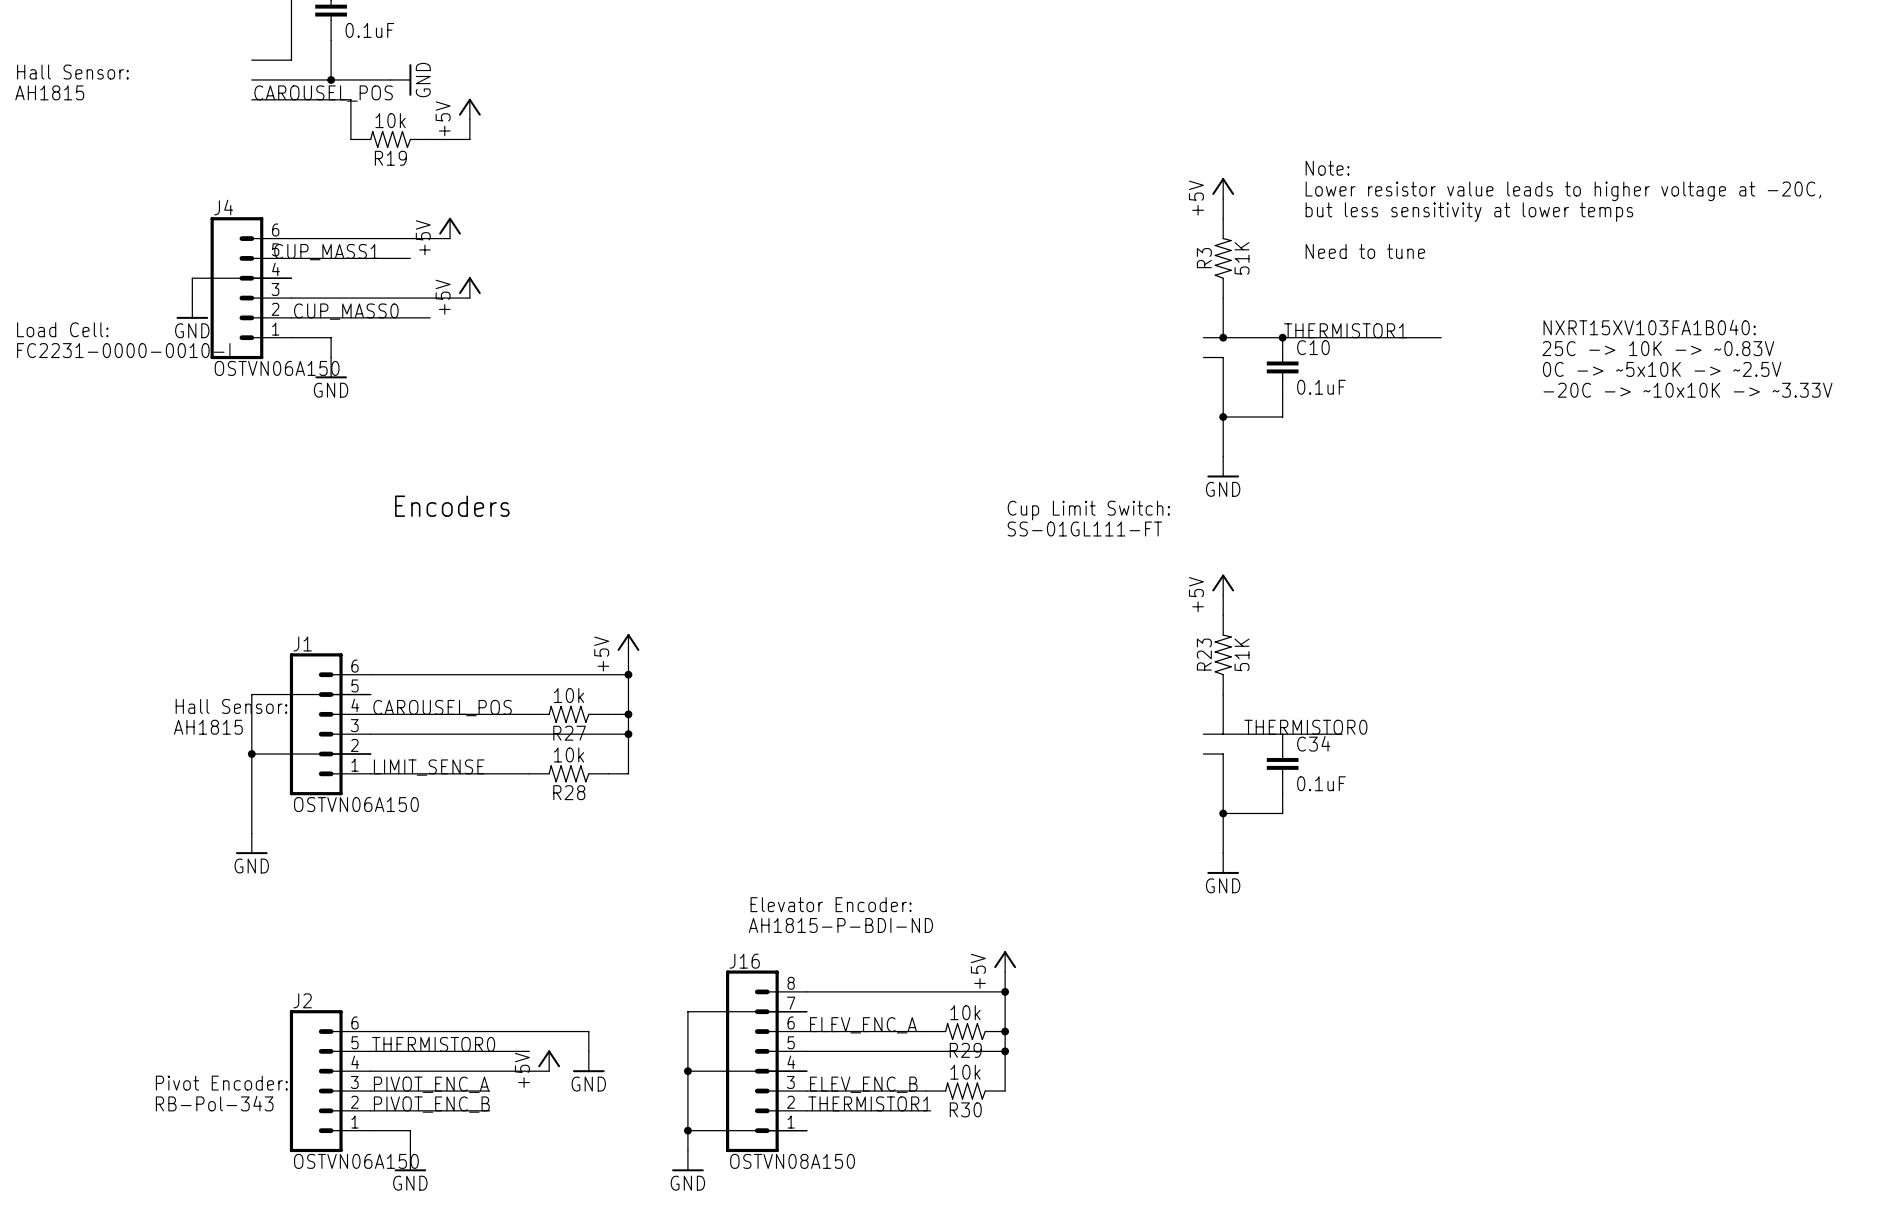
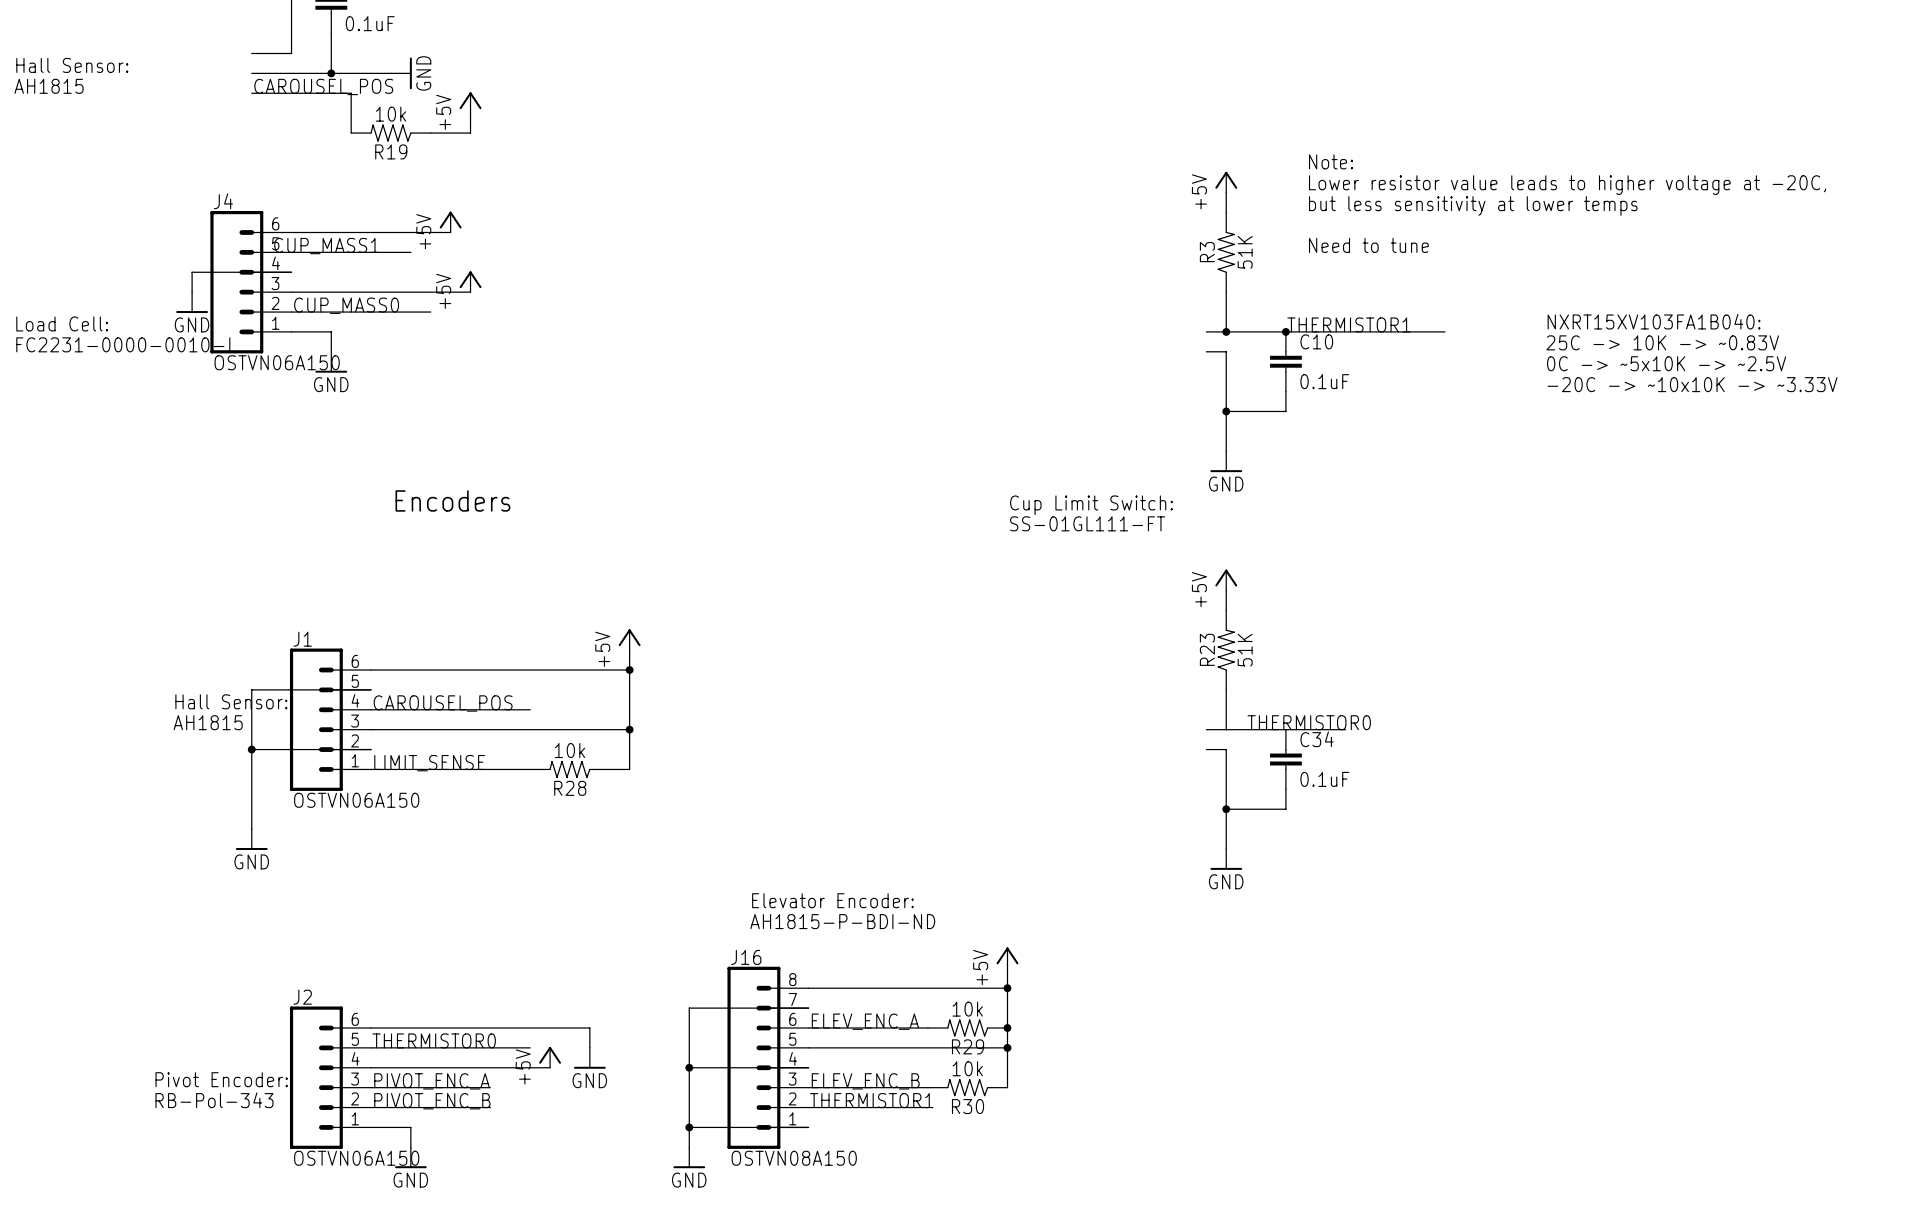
R27: 10k (568, 714) -> none
wire: (608, 714) (628, 714) -> none
junction: (628, 714) -> none

